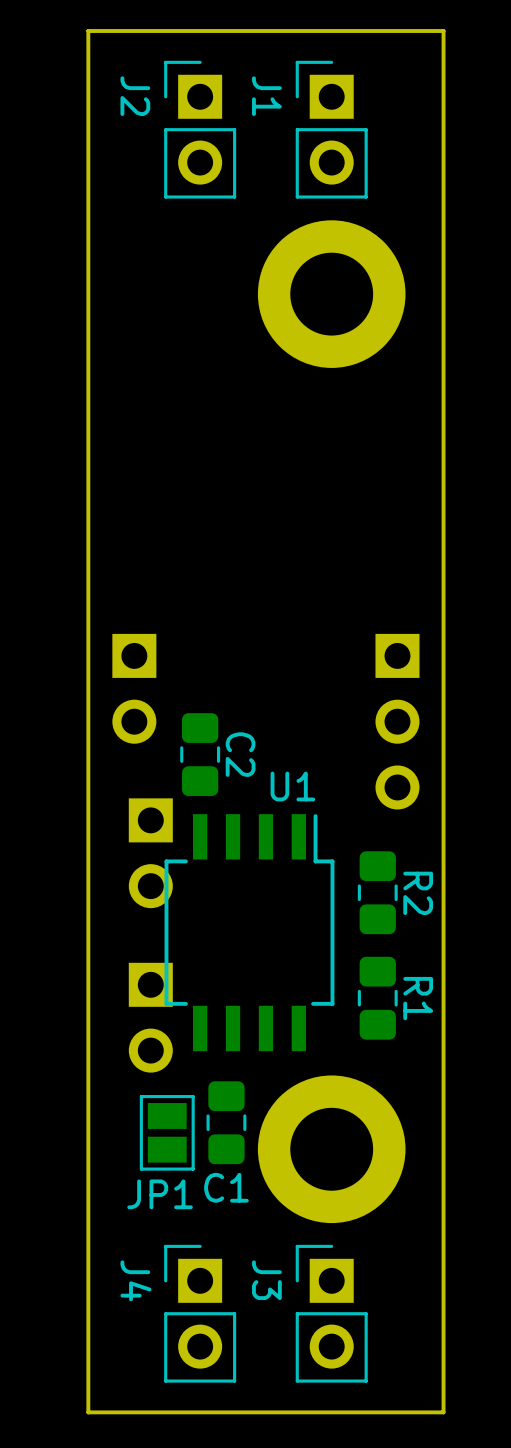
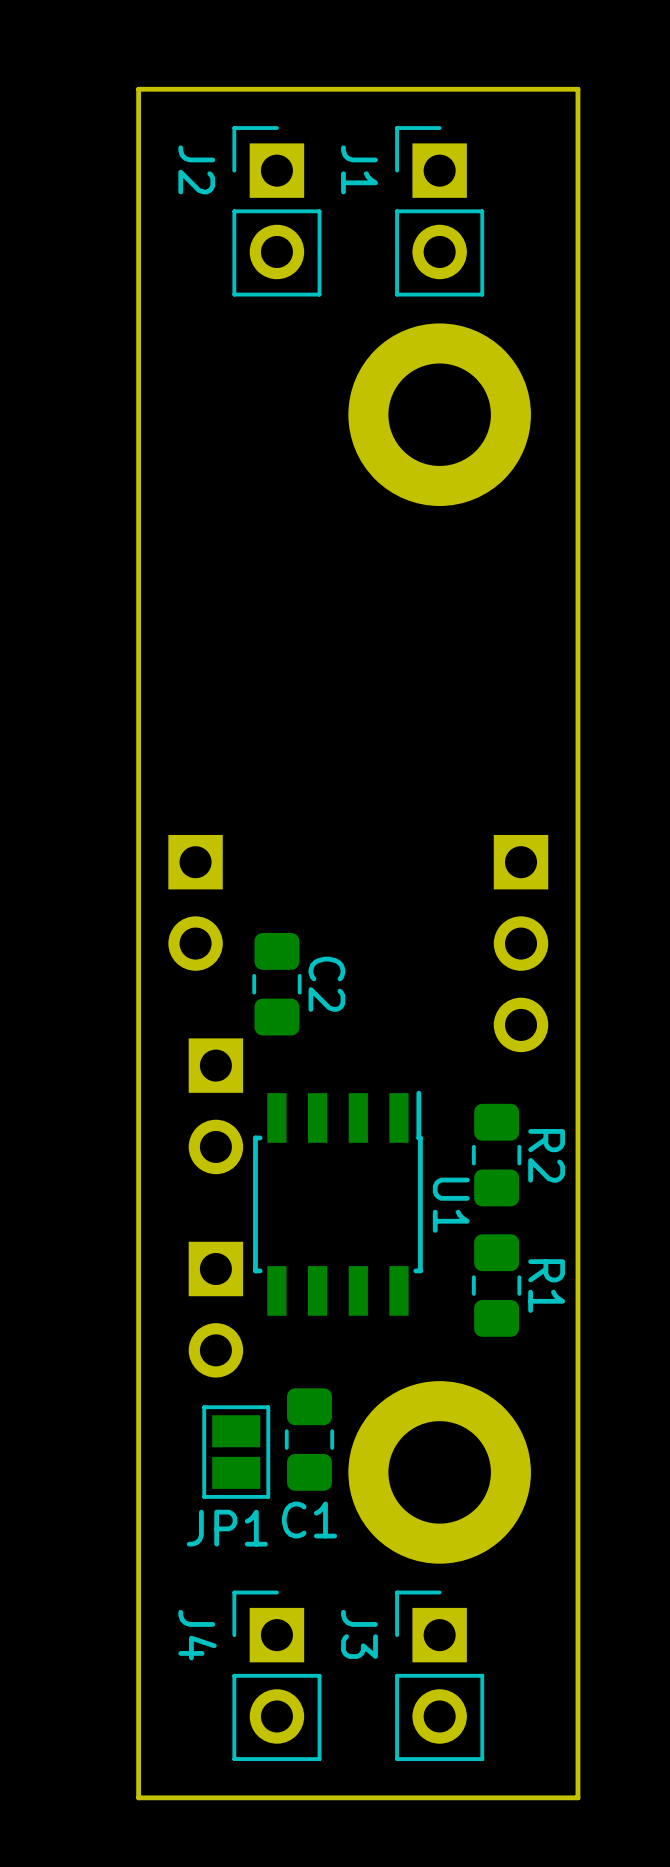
U1 name position: U1 (292, 786) -> U1 (451, 1205)
U1 footprint: [164, 814, 335, 1052] -> [253, 1090, 423, 1316]

